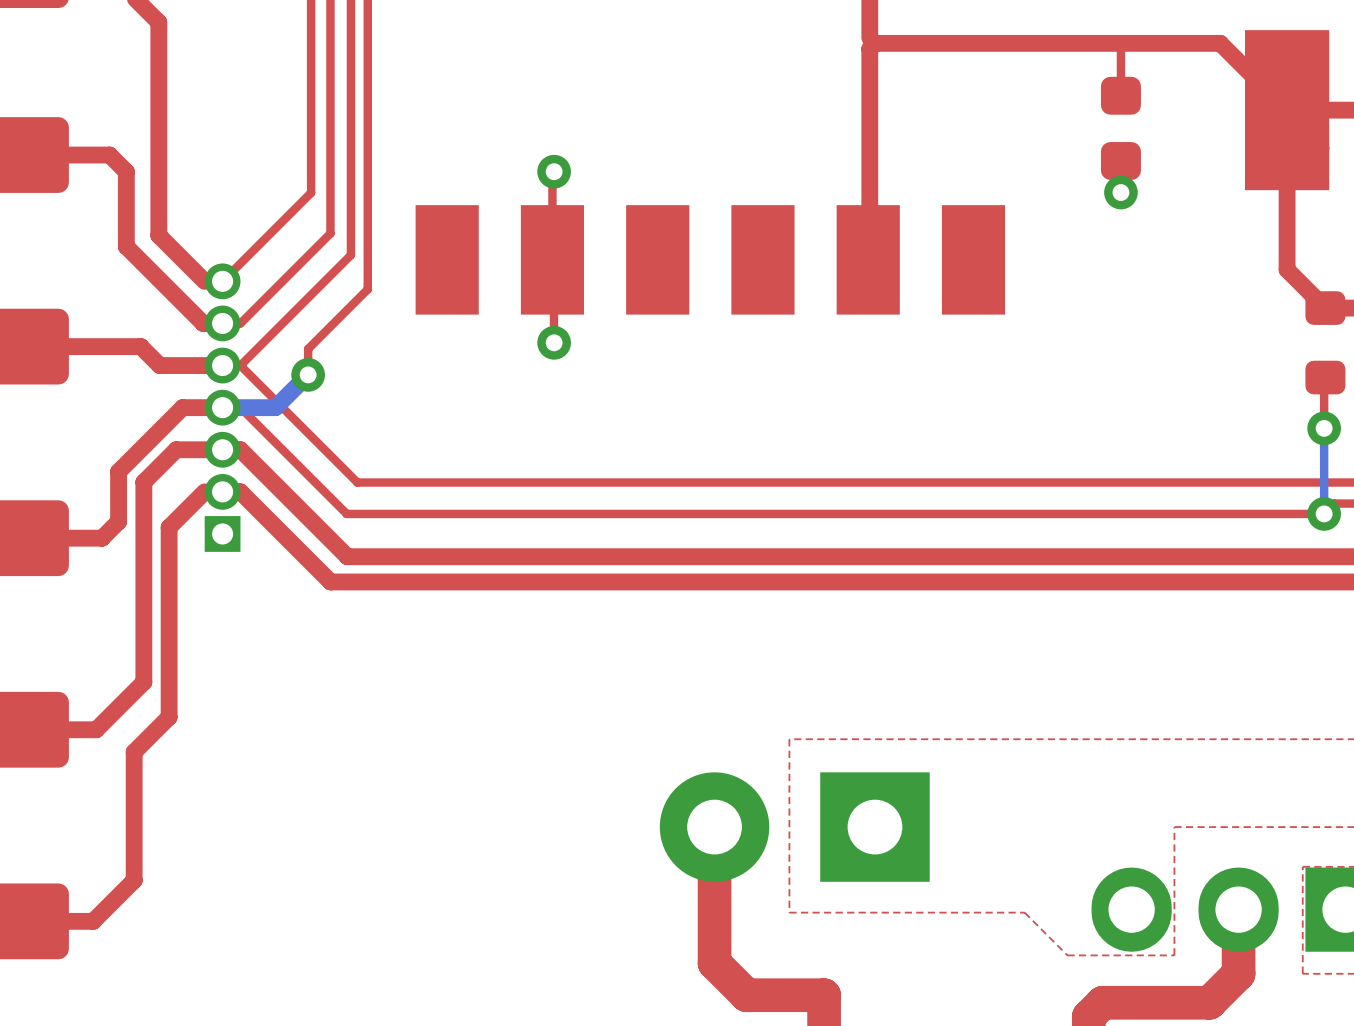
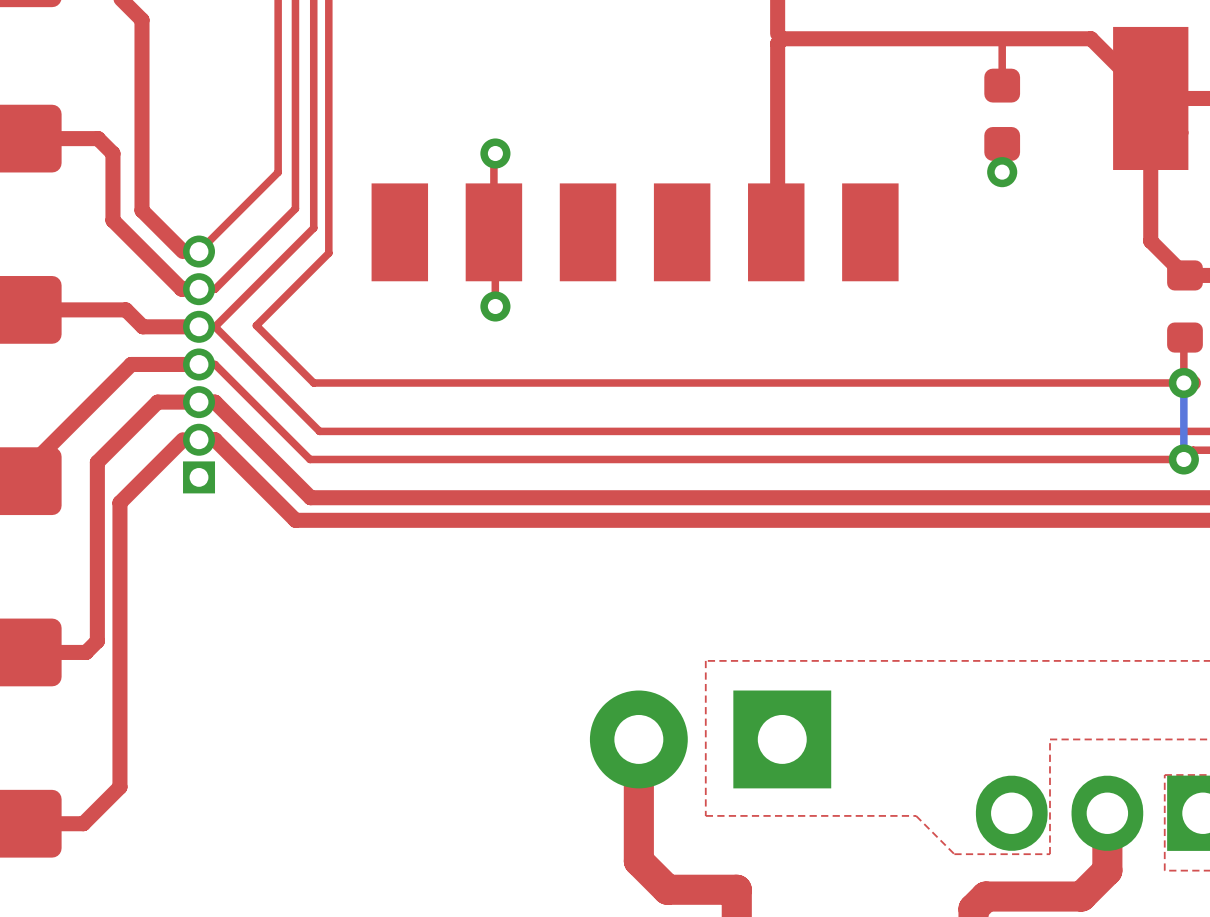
top track: (367, 283) (367, 289) (308, 348) (308, 374) -> (328, 253) (256, 325) (313, 382) (1193, 382)
bottom track: (308, 374) (275, 407) (222, 407) -> none
via: (308, 374) -> none
top track: (182, 407) (118, 471) (118, 521) (102, 538) (16, 538) -> (163, 364) (131, 364) (14, 481)
top track: (143, 482) (143, 682) (108, 717) -> (128, 431) (97, 462) (97, 641)
top track: (169, 527) (169, 717) (134, 752) -> (151, 471) (119, 502) (119, 672)

